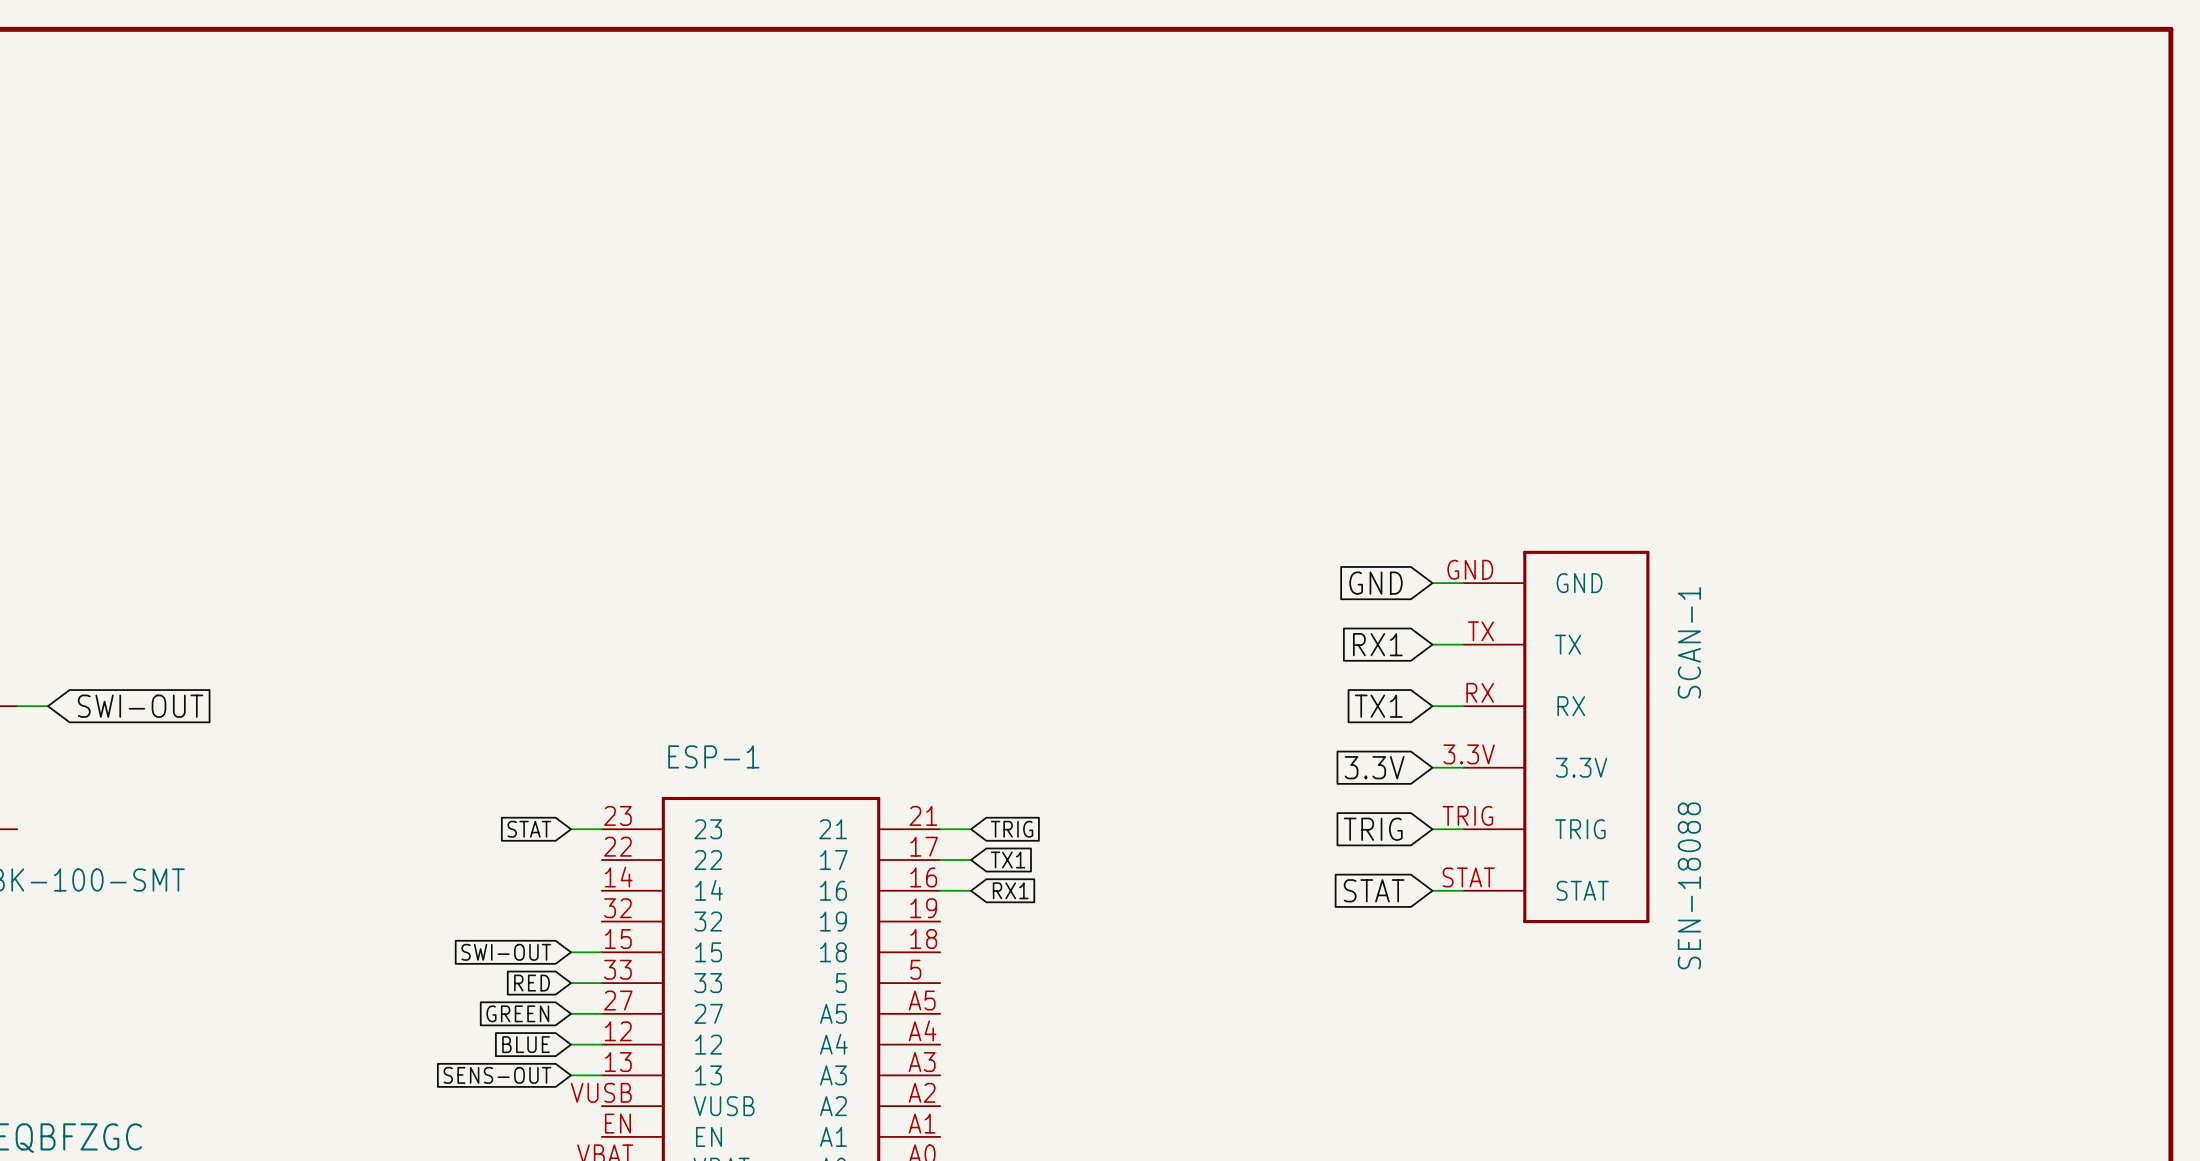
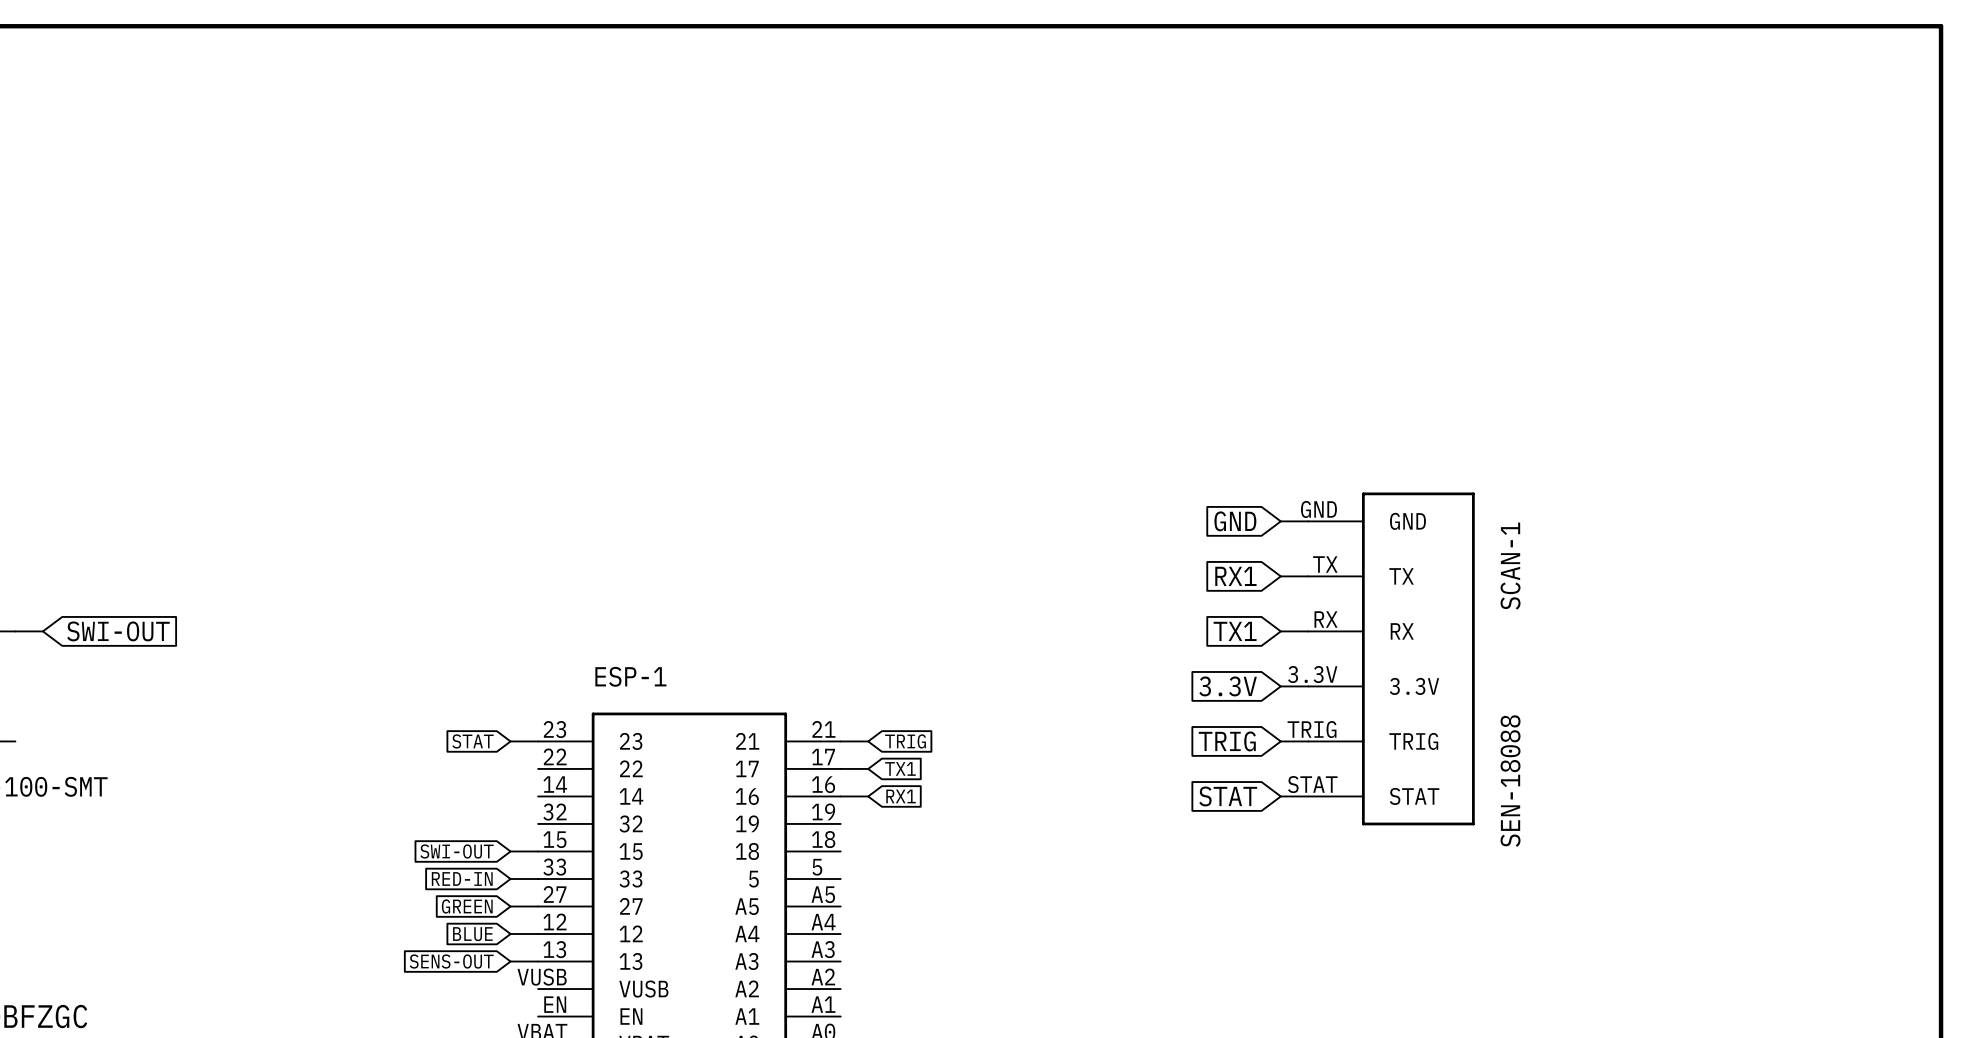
global label: RED (532, 983) -> RED-IN (462, 878)

